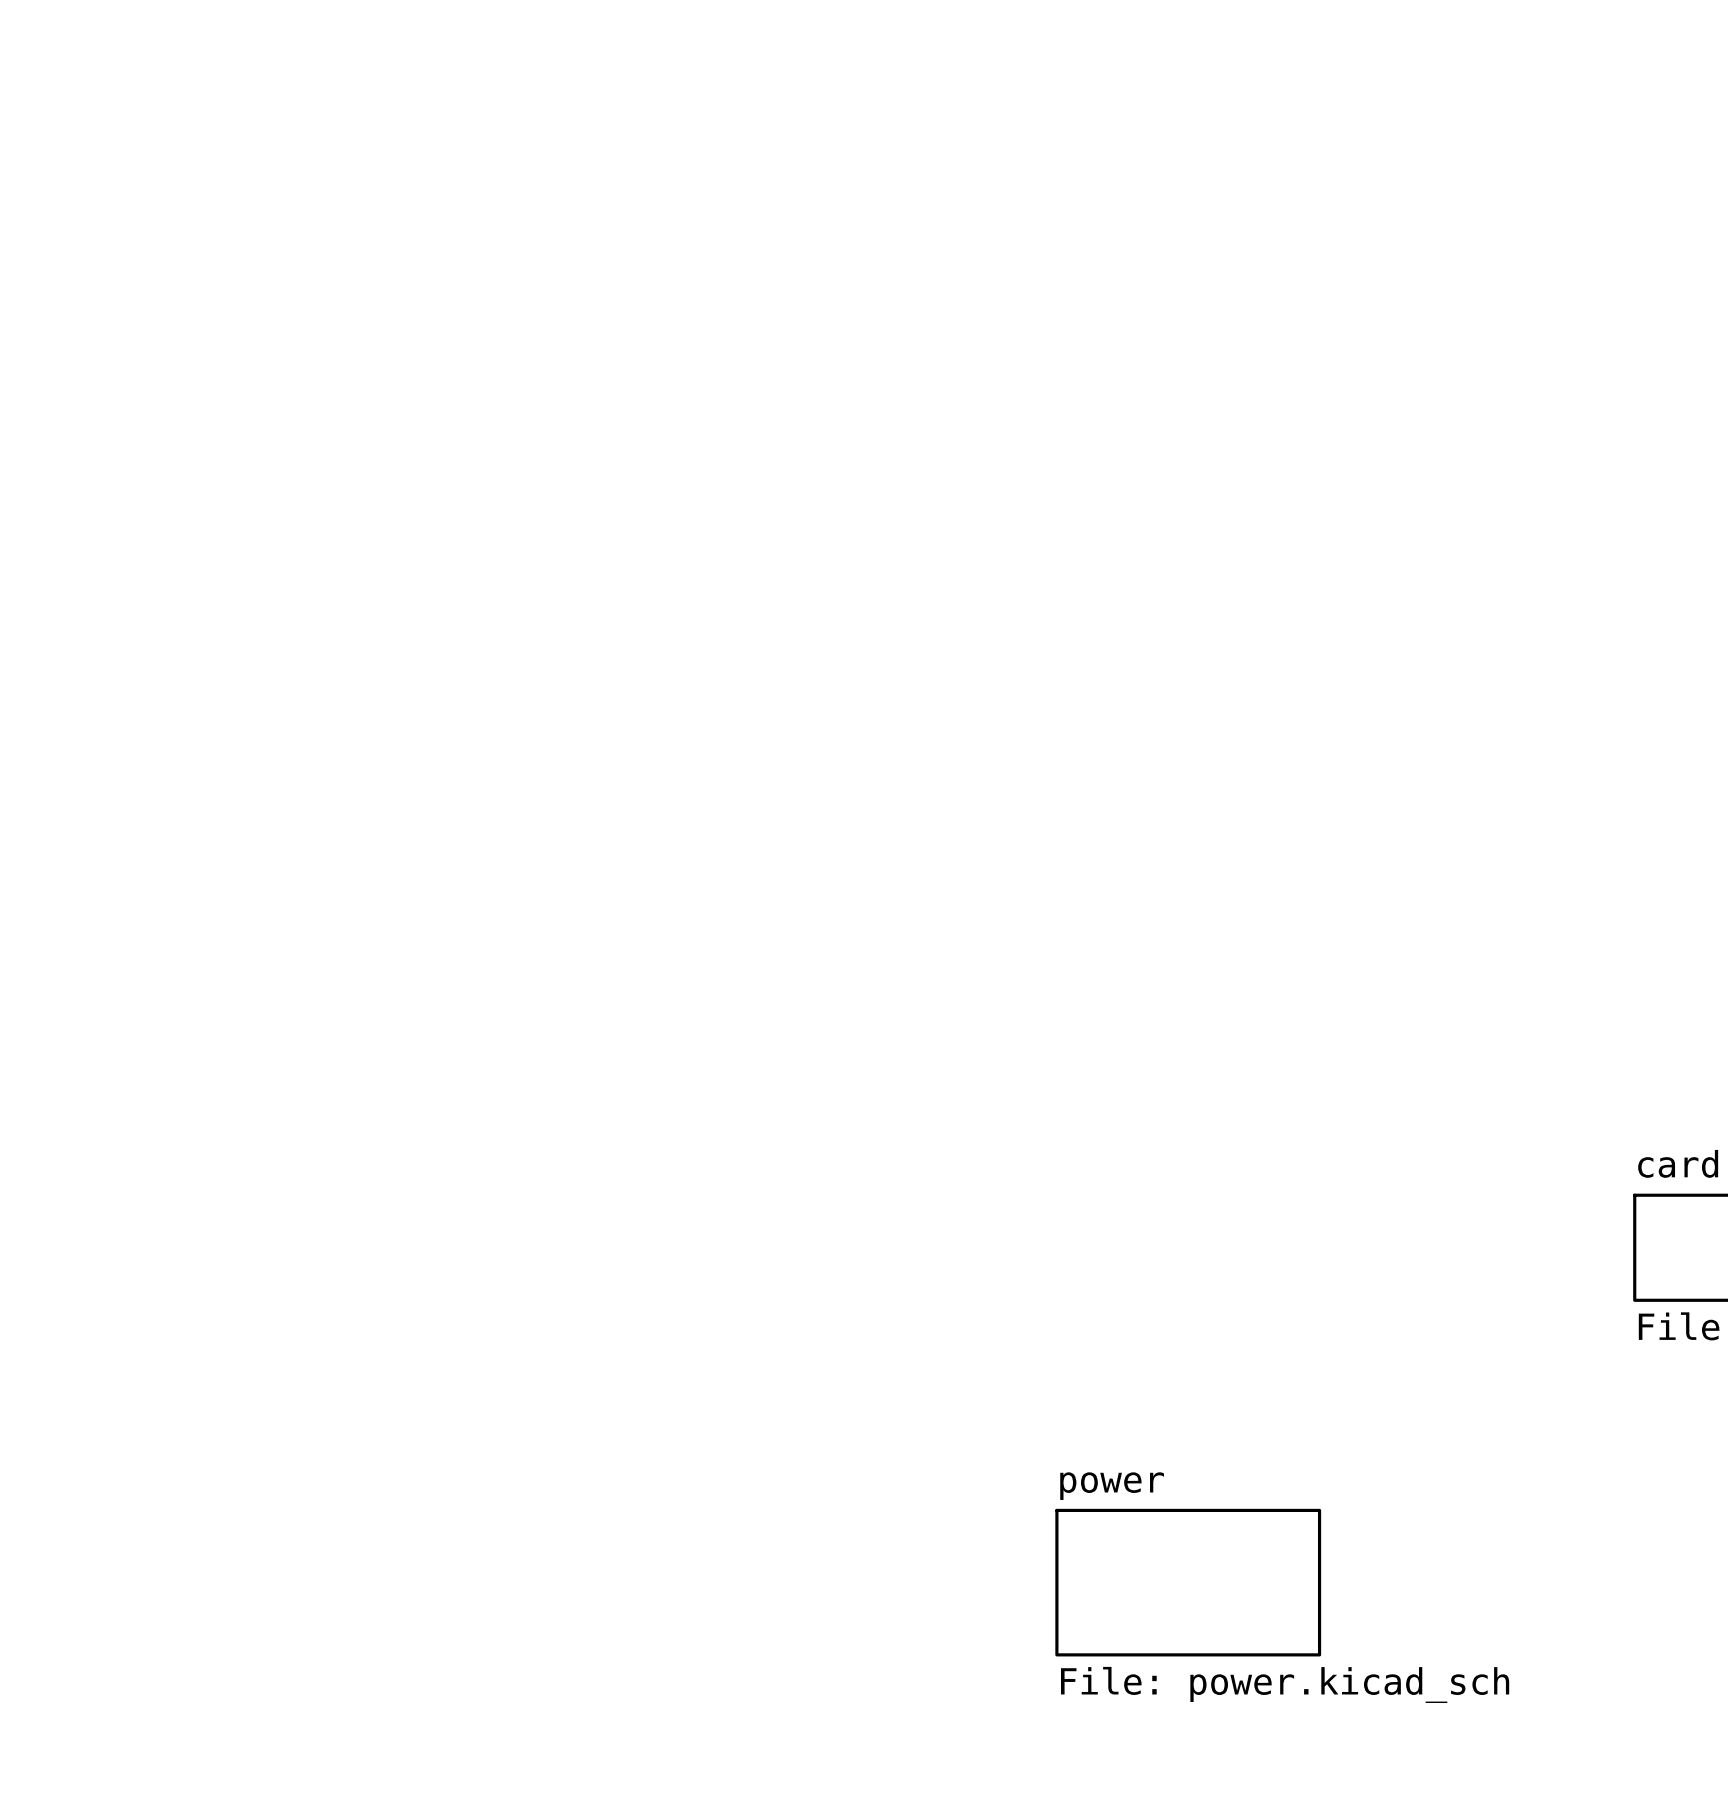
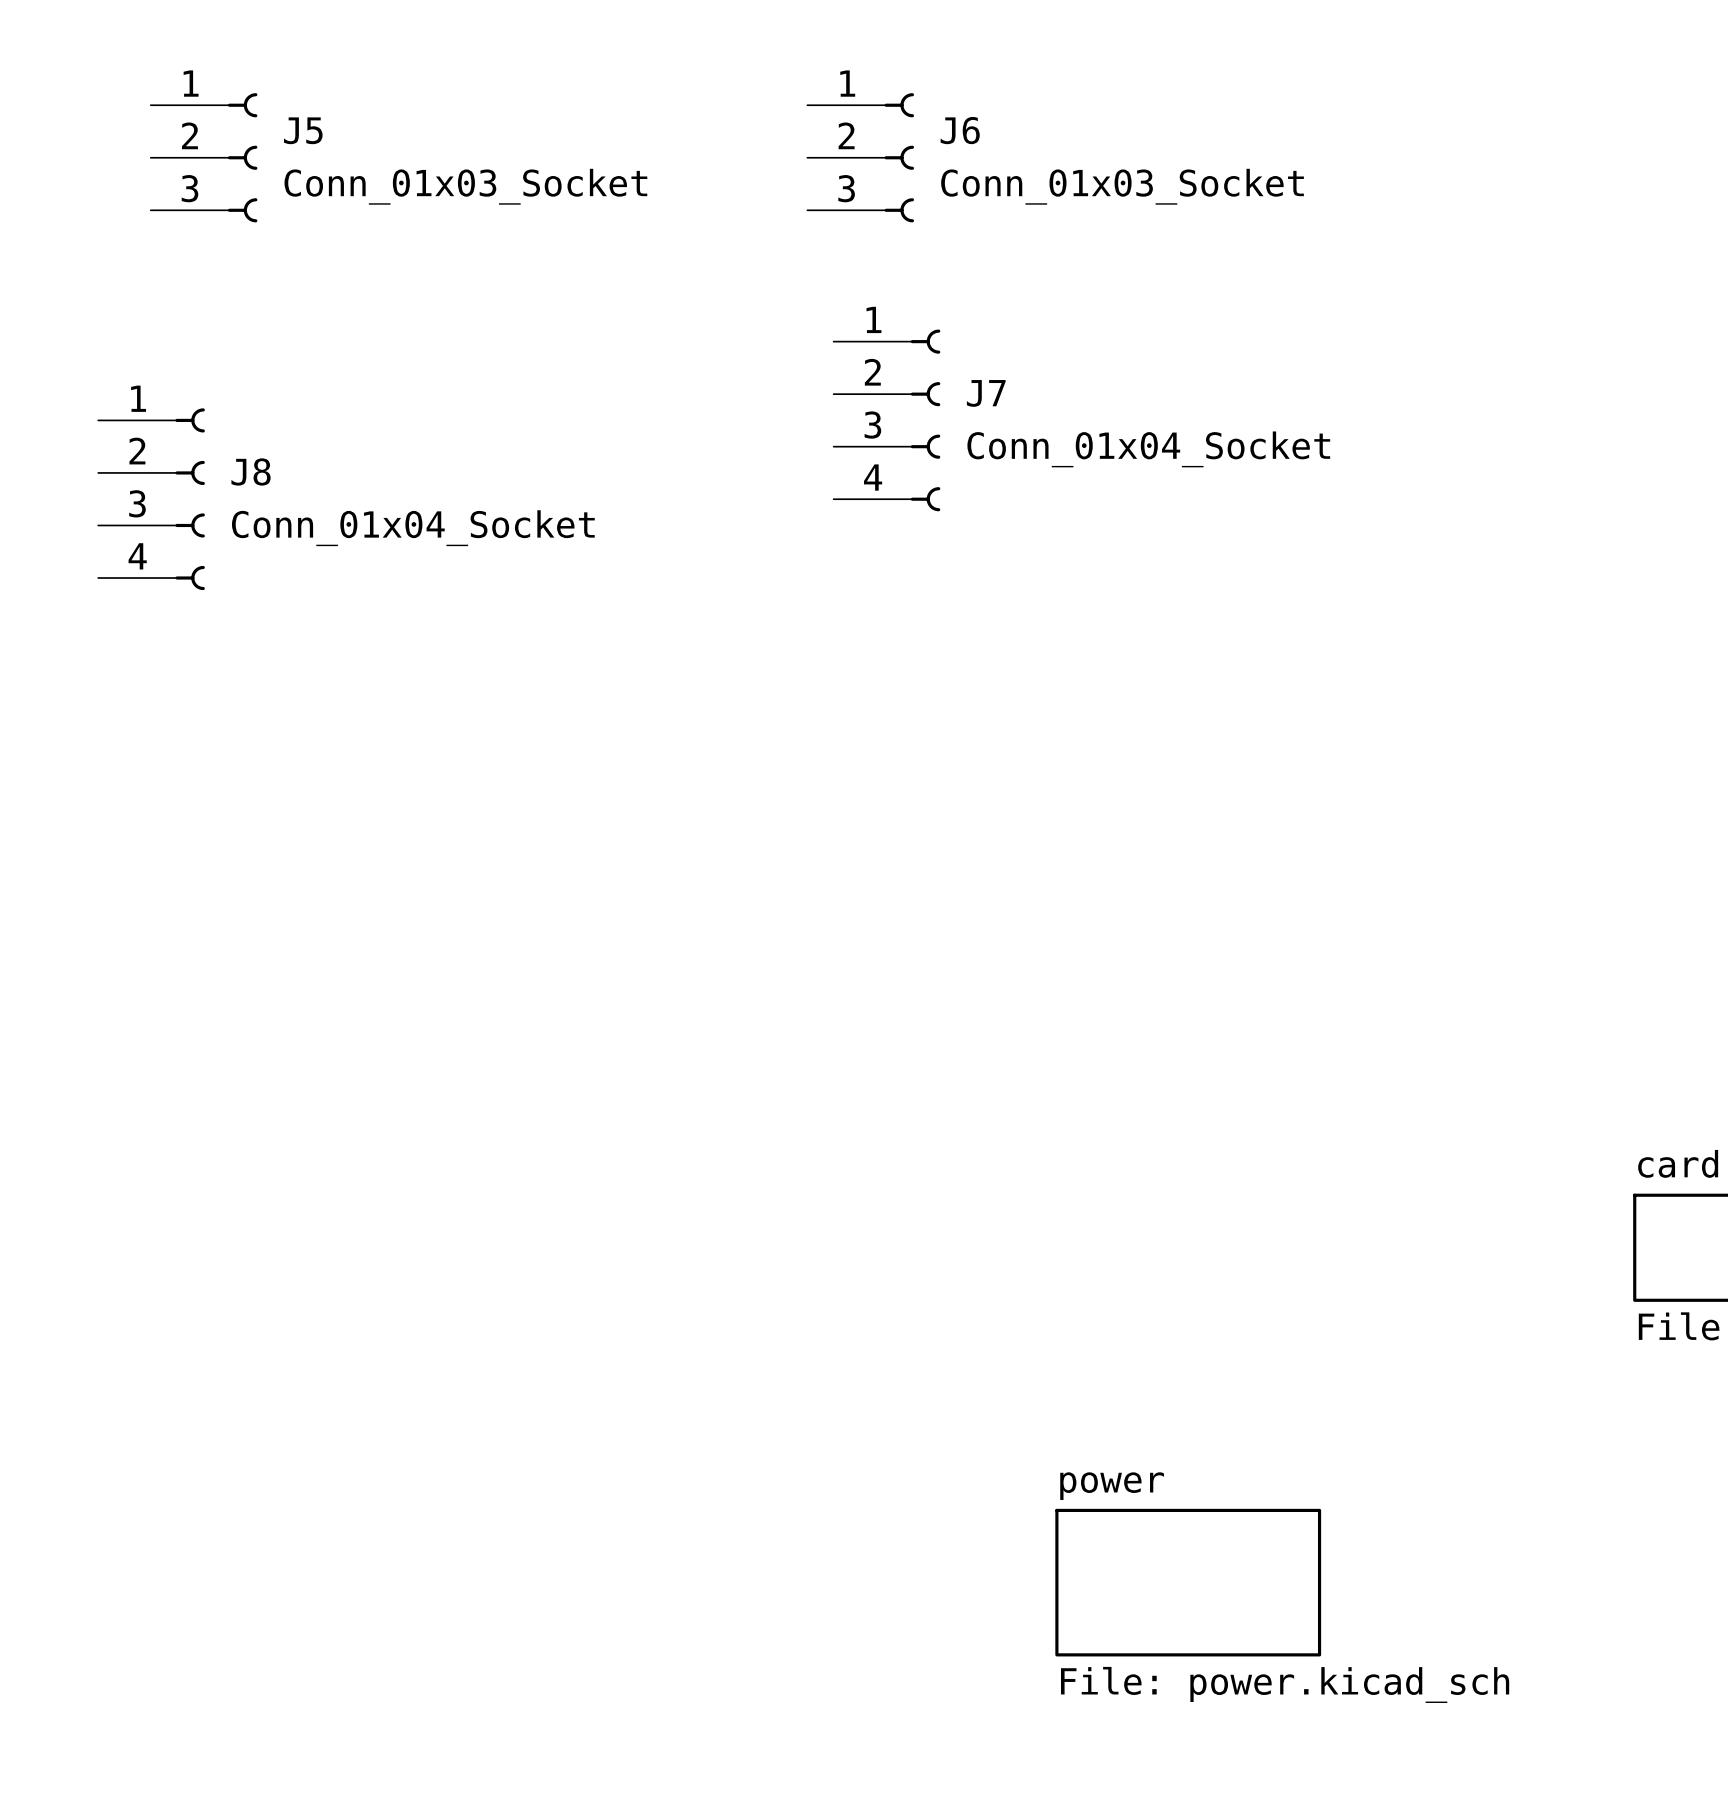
J5: none -> Conn_01x03_Socket (204, 157)
J6: none -> Conn_01x03_Socket (860, 157)
J7: none -> Conn_01x04_Socket (886, 420)
J8: none -> Conn_01x04_Socket (151, 499)

